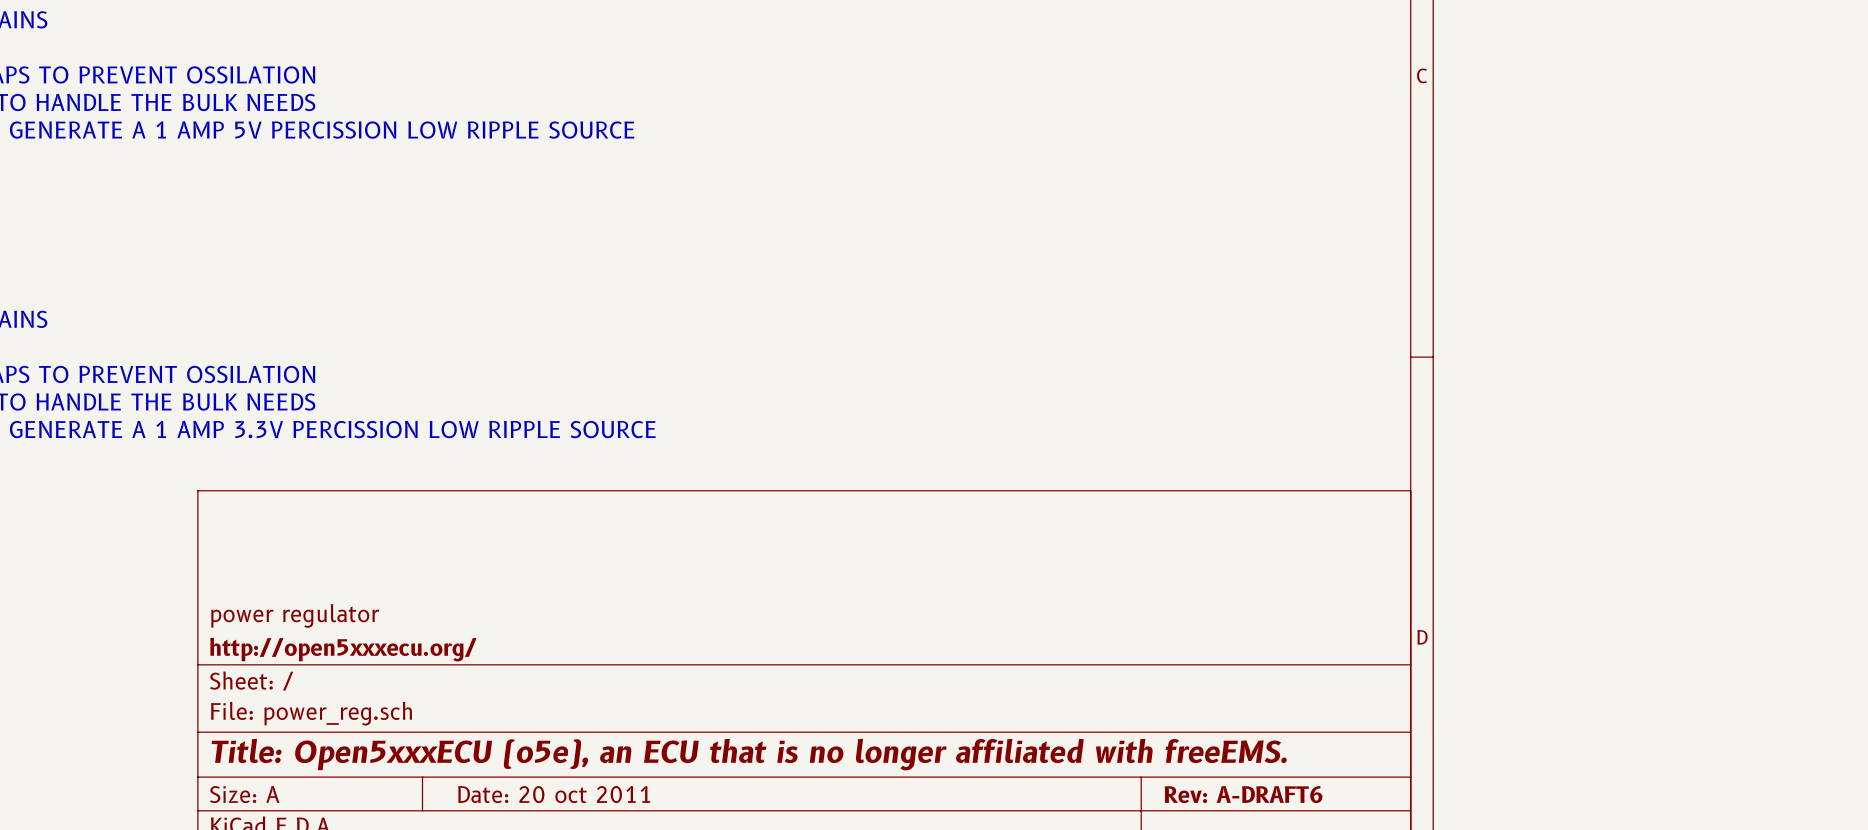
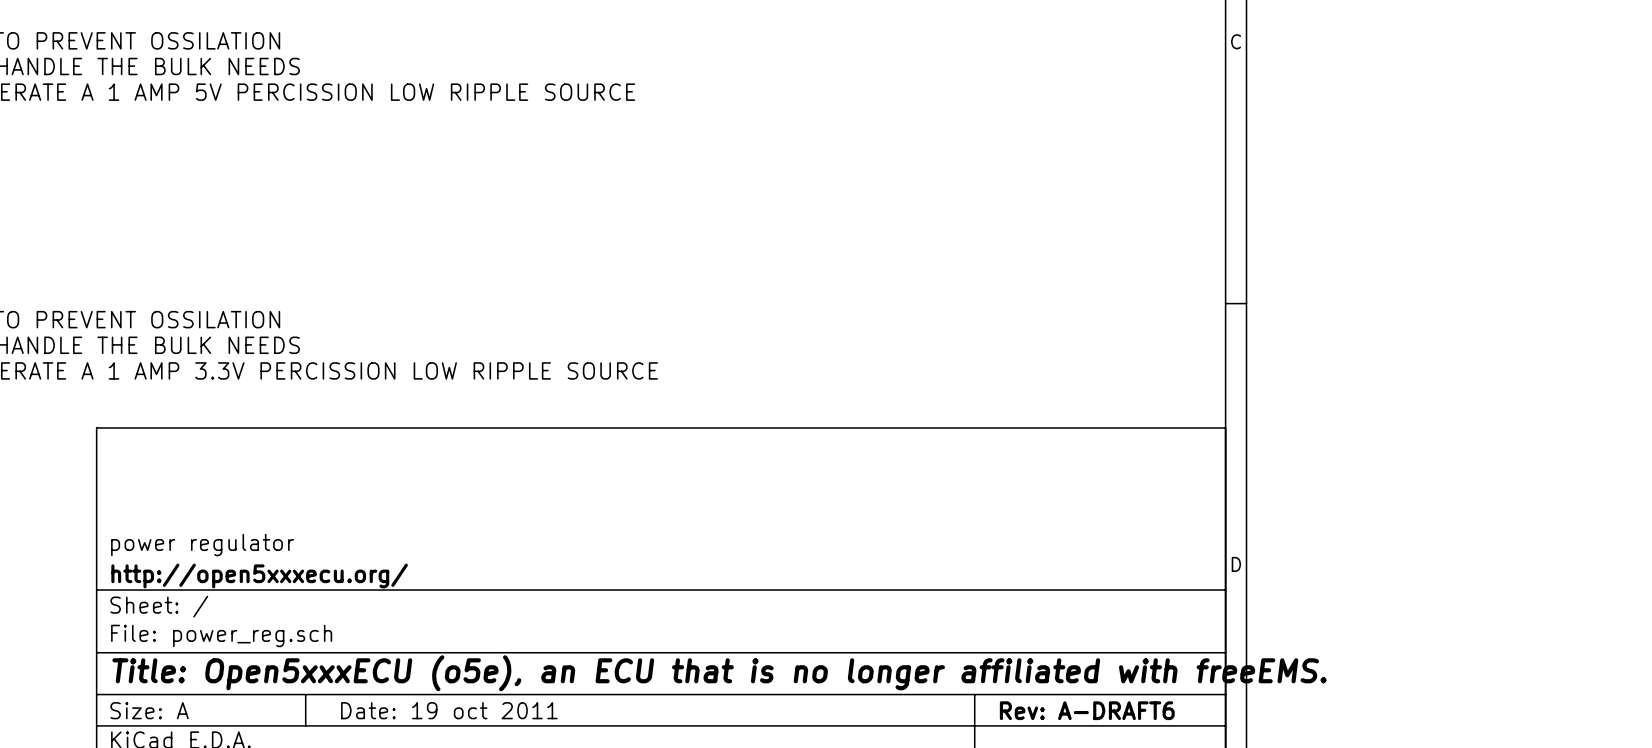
title block: Date: 20 oct 2011 (554, 794) -> Date: 19 oct 2011 (449, 710)

